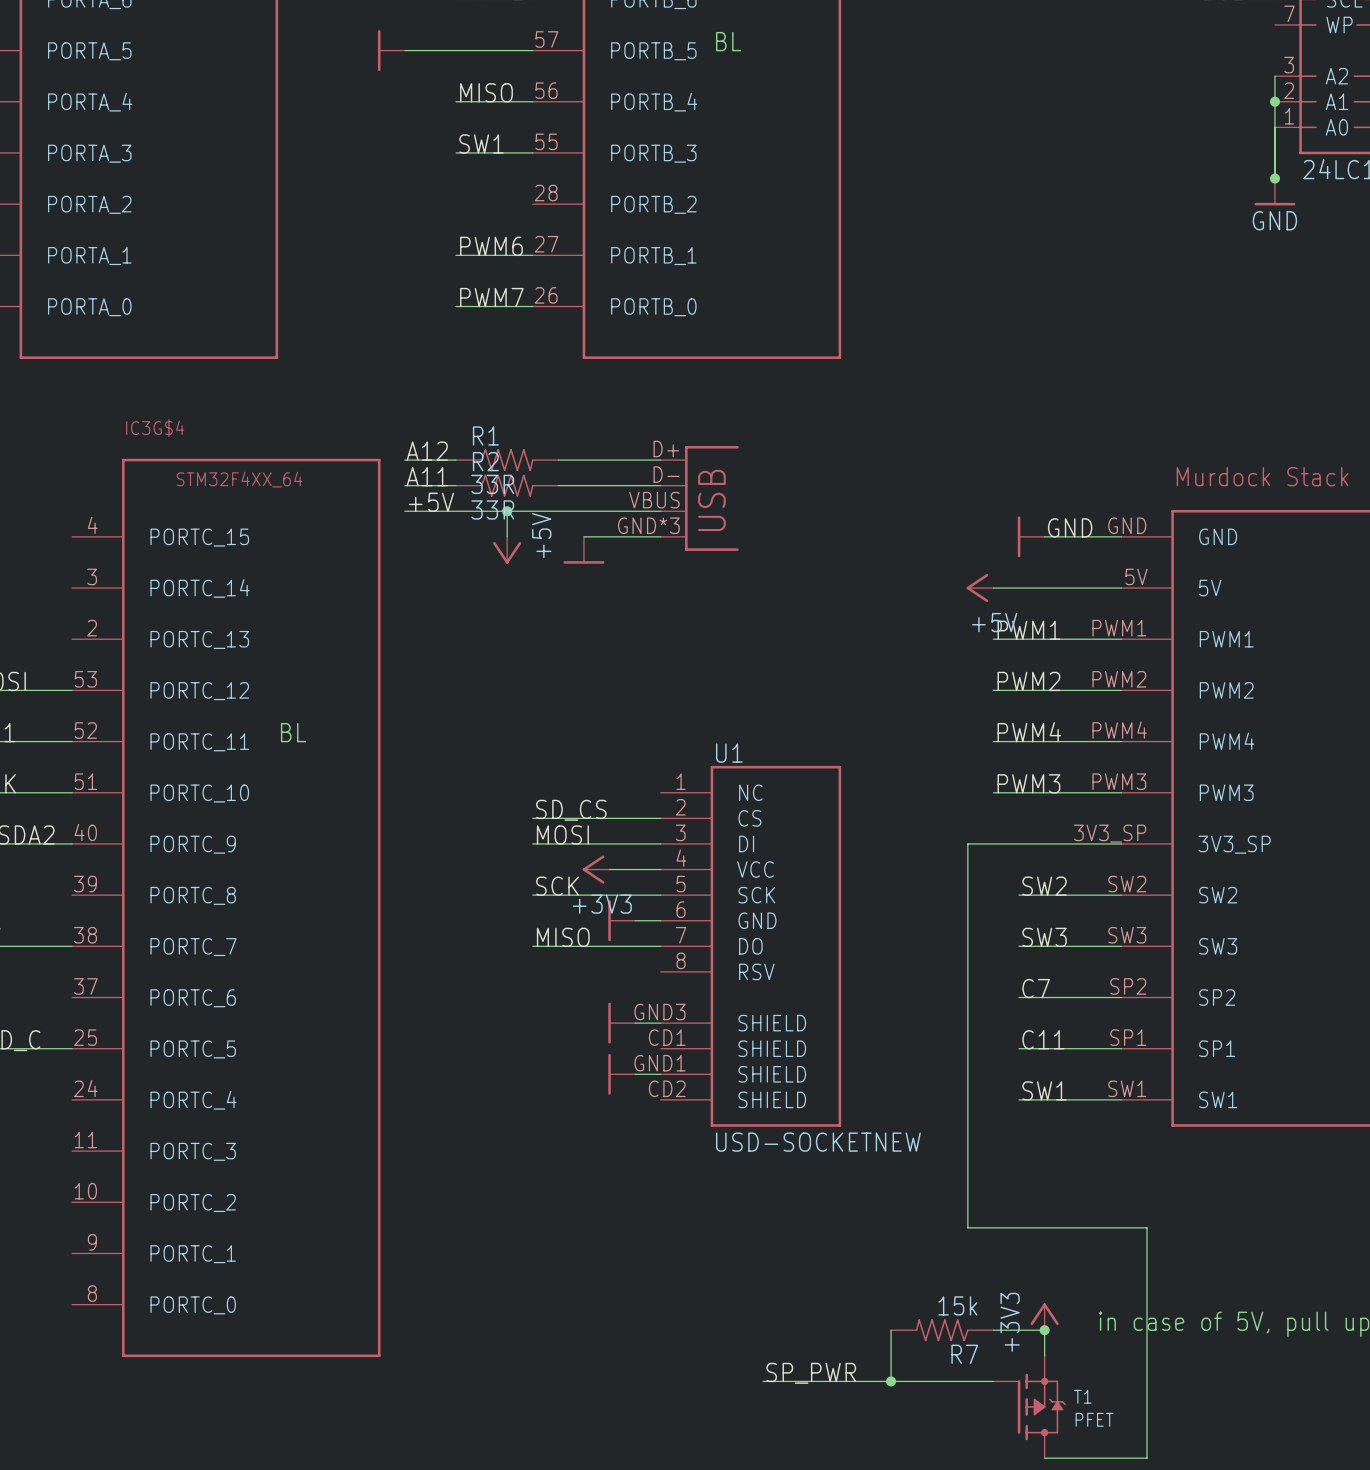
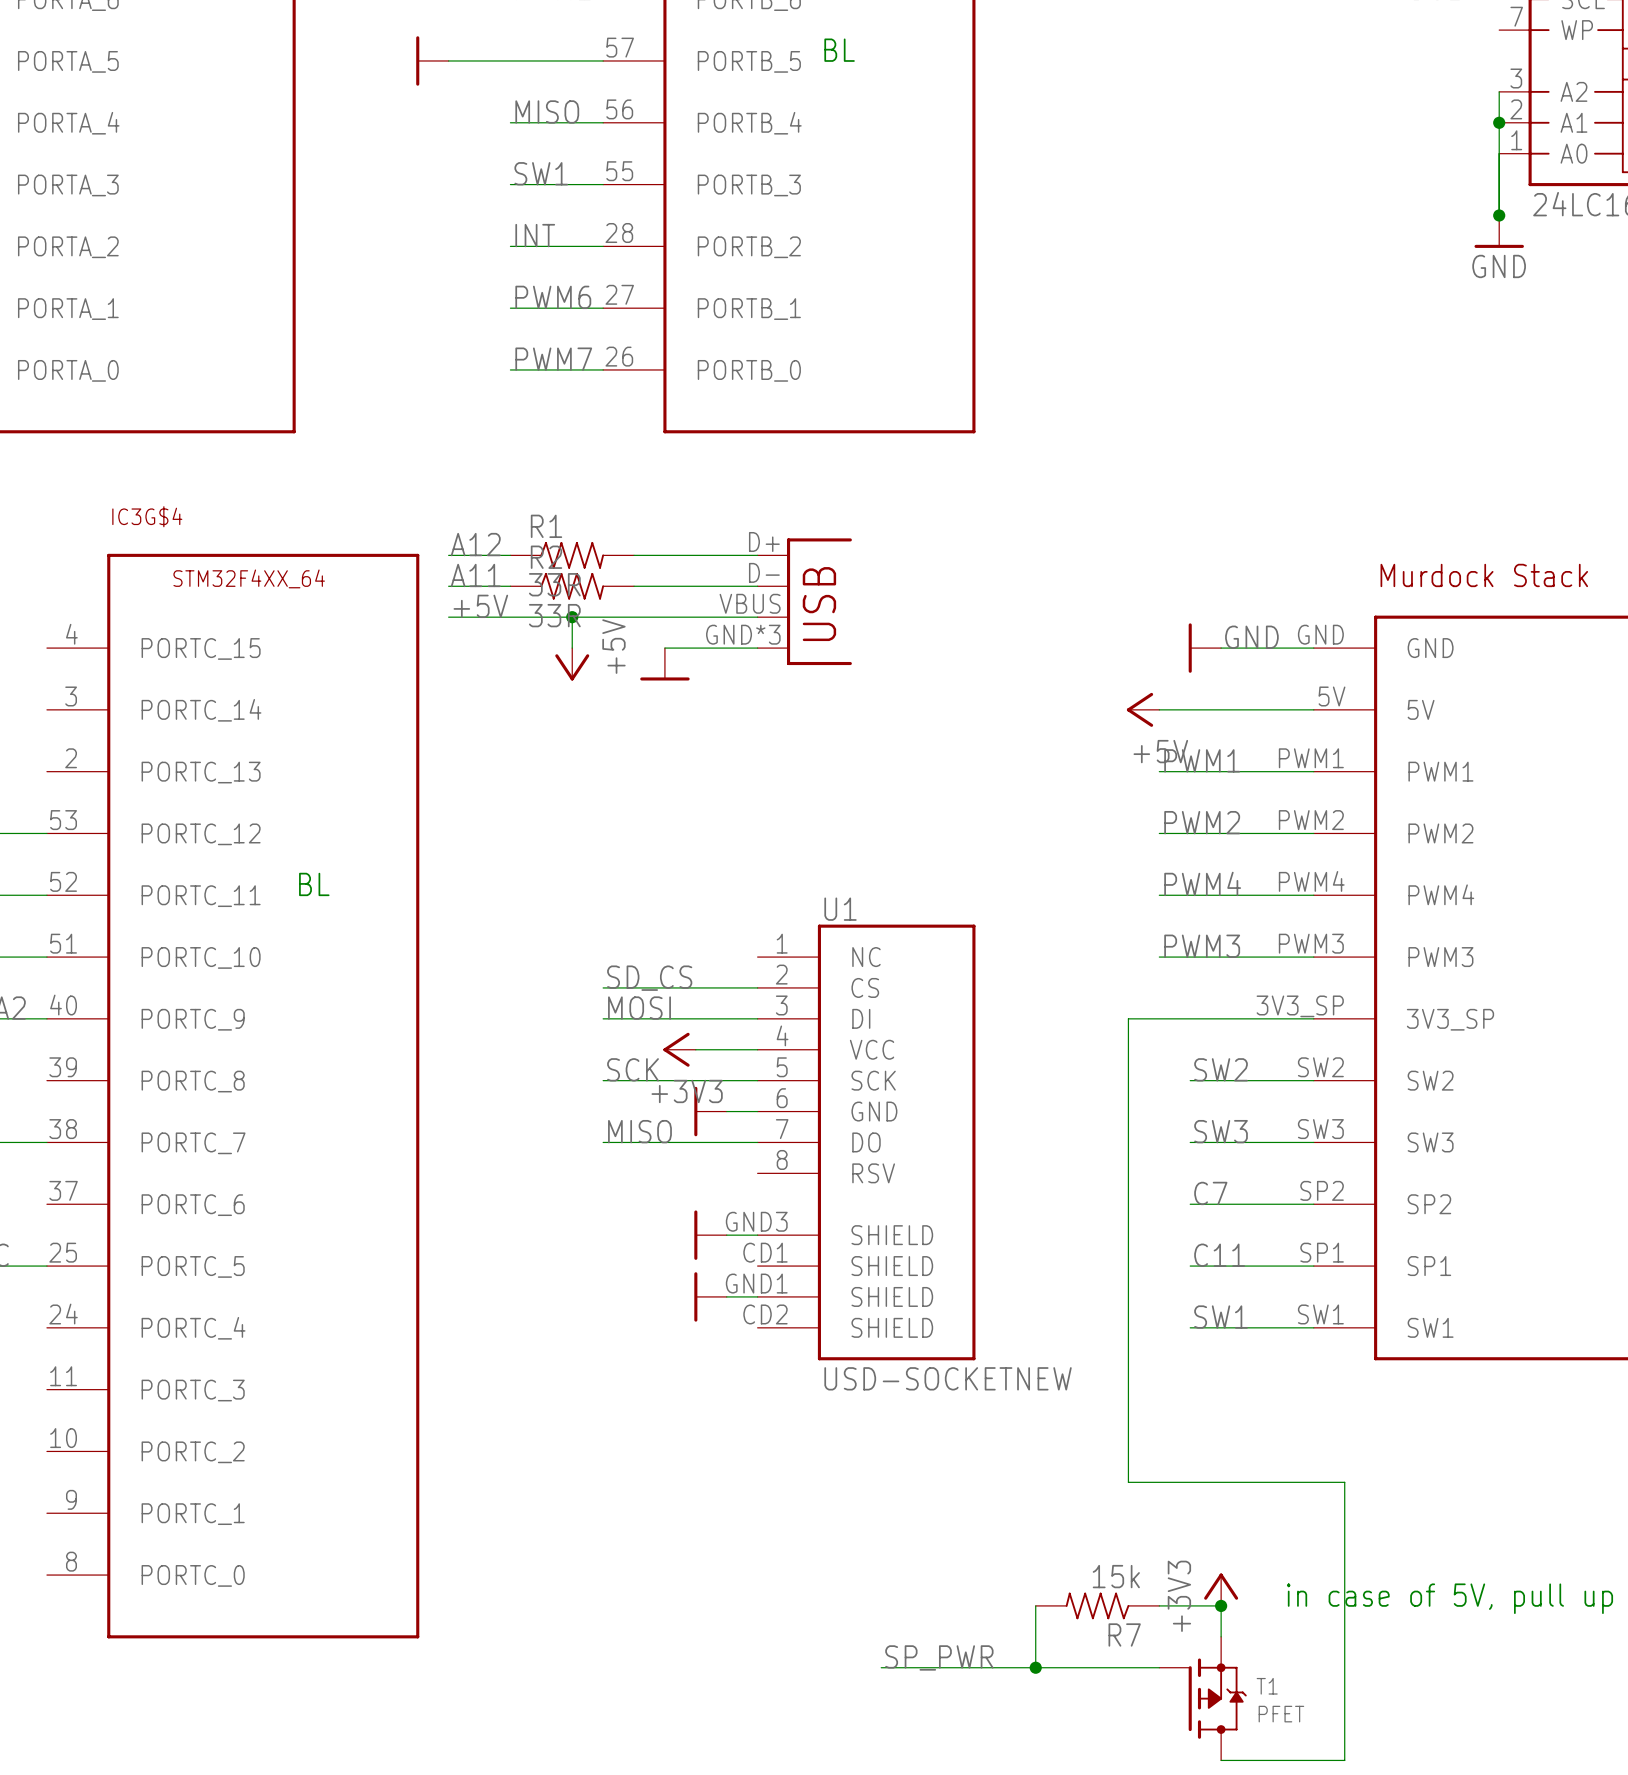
label: none -> INT (535, 235)
wire: none -> (510, 246) (603, 246)

